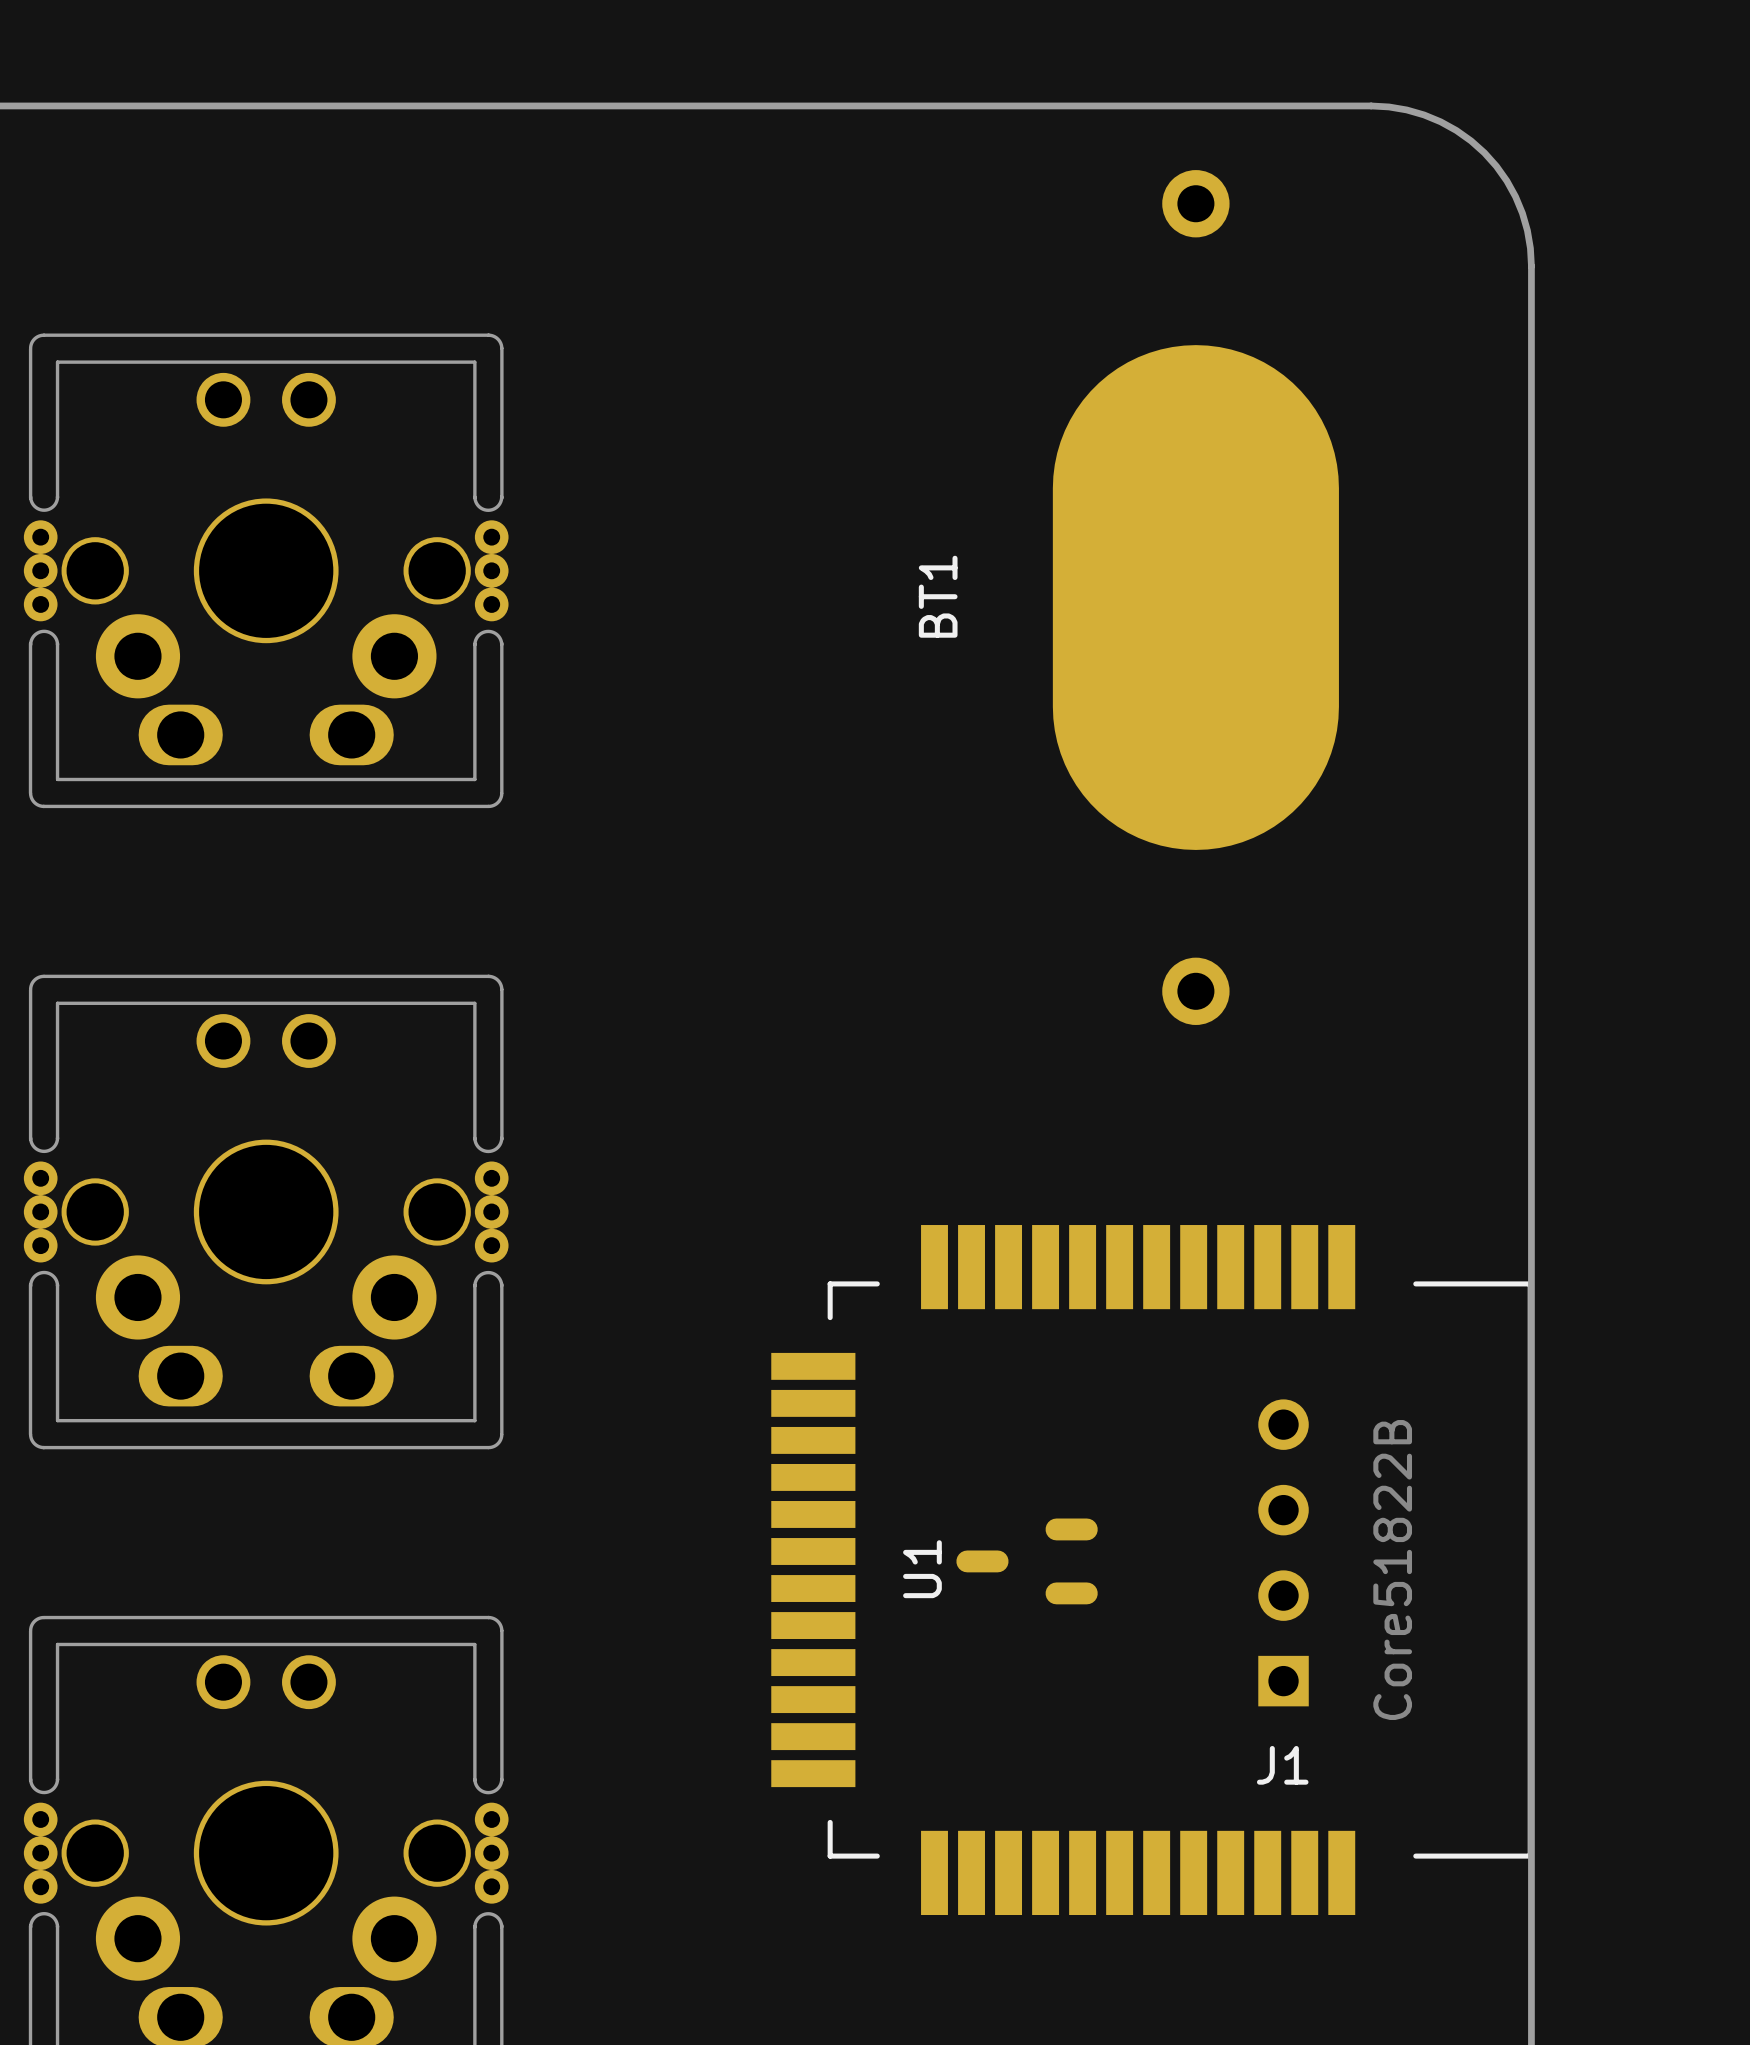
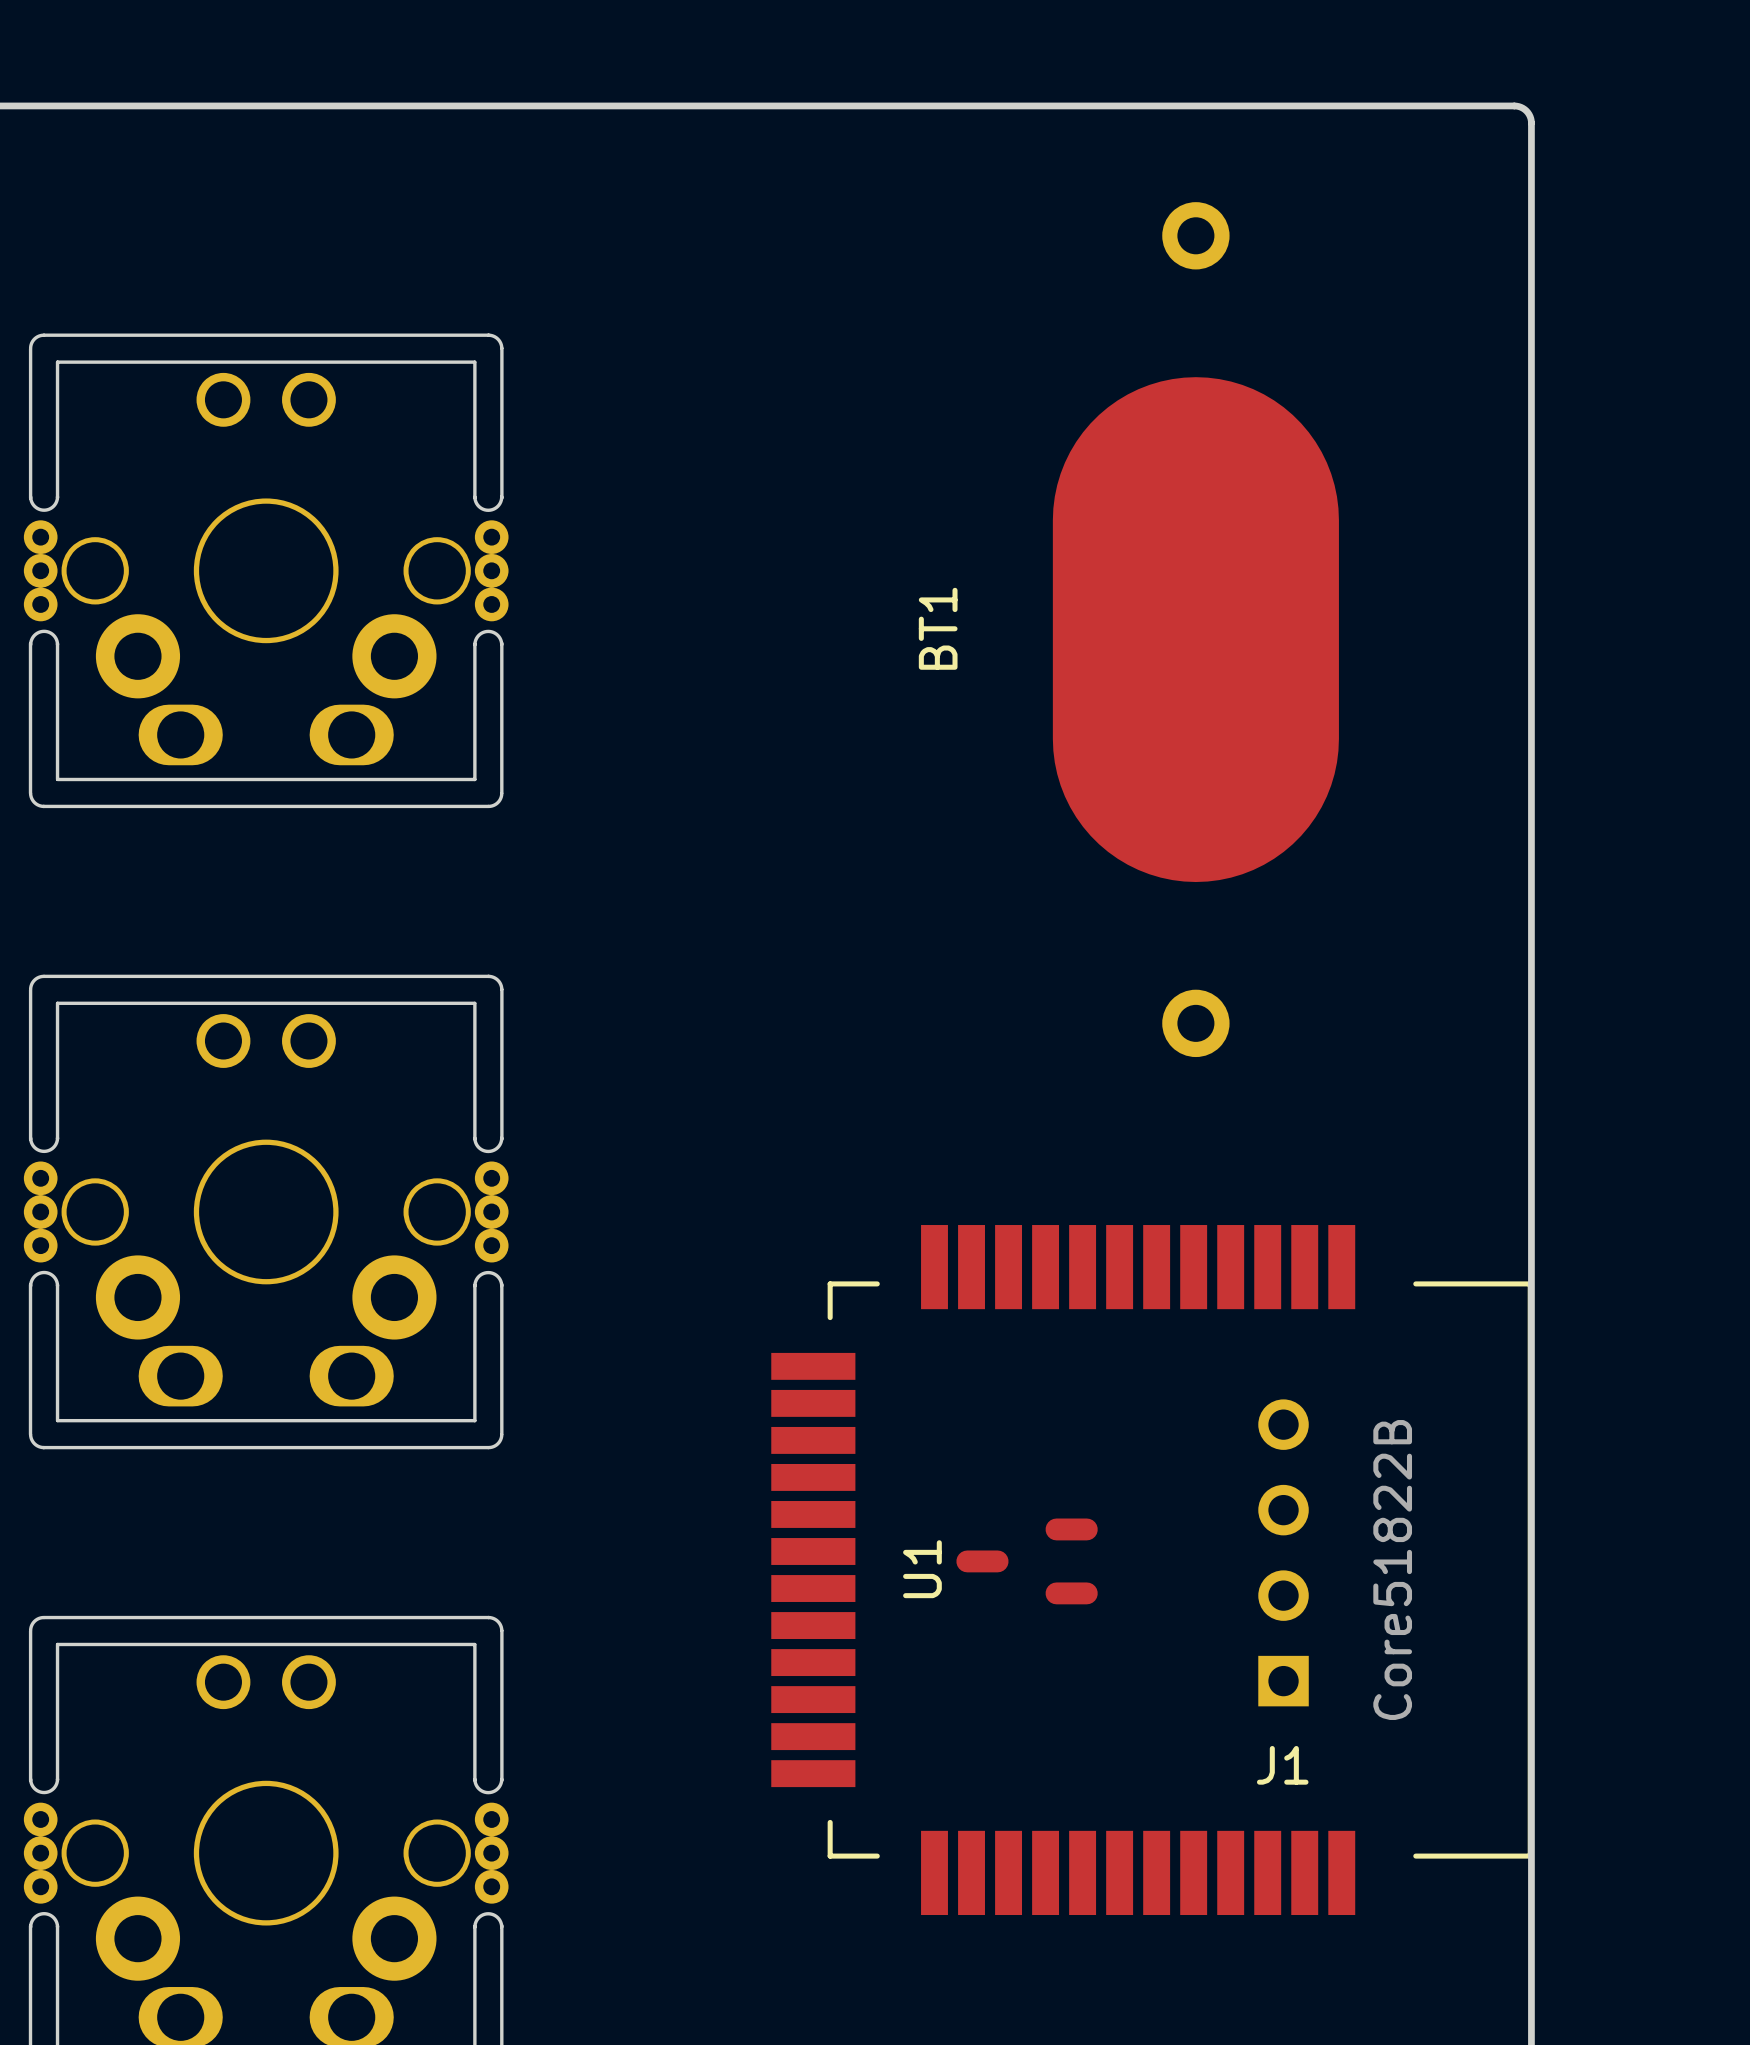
board edge: (1371, 105) (1389, 106) (1424, 114) (1456, 130) (1484, 152) (1506, 180) (1522, 213) (1527, 230) (1531, 266) -> (1371, 105) (1514, 105) (1526, 110) (1531, 123) (1531, 266)
BT1 position: (1195, 597) -> (1195, 629)

